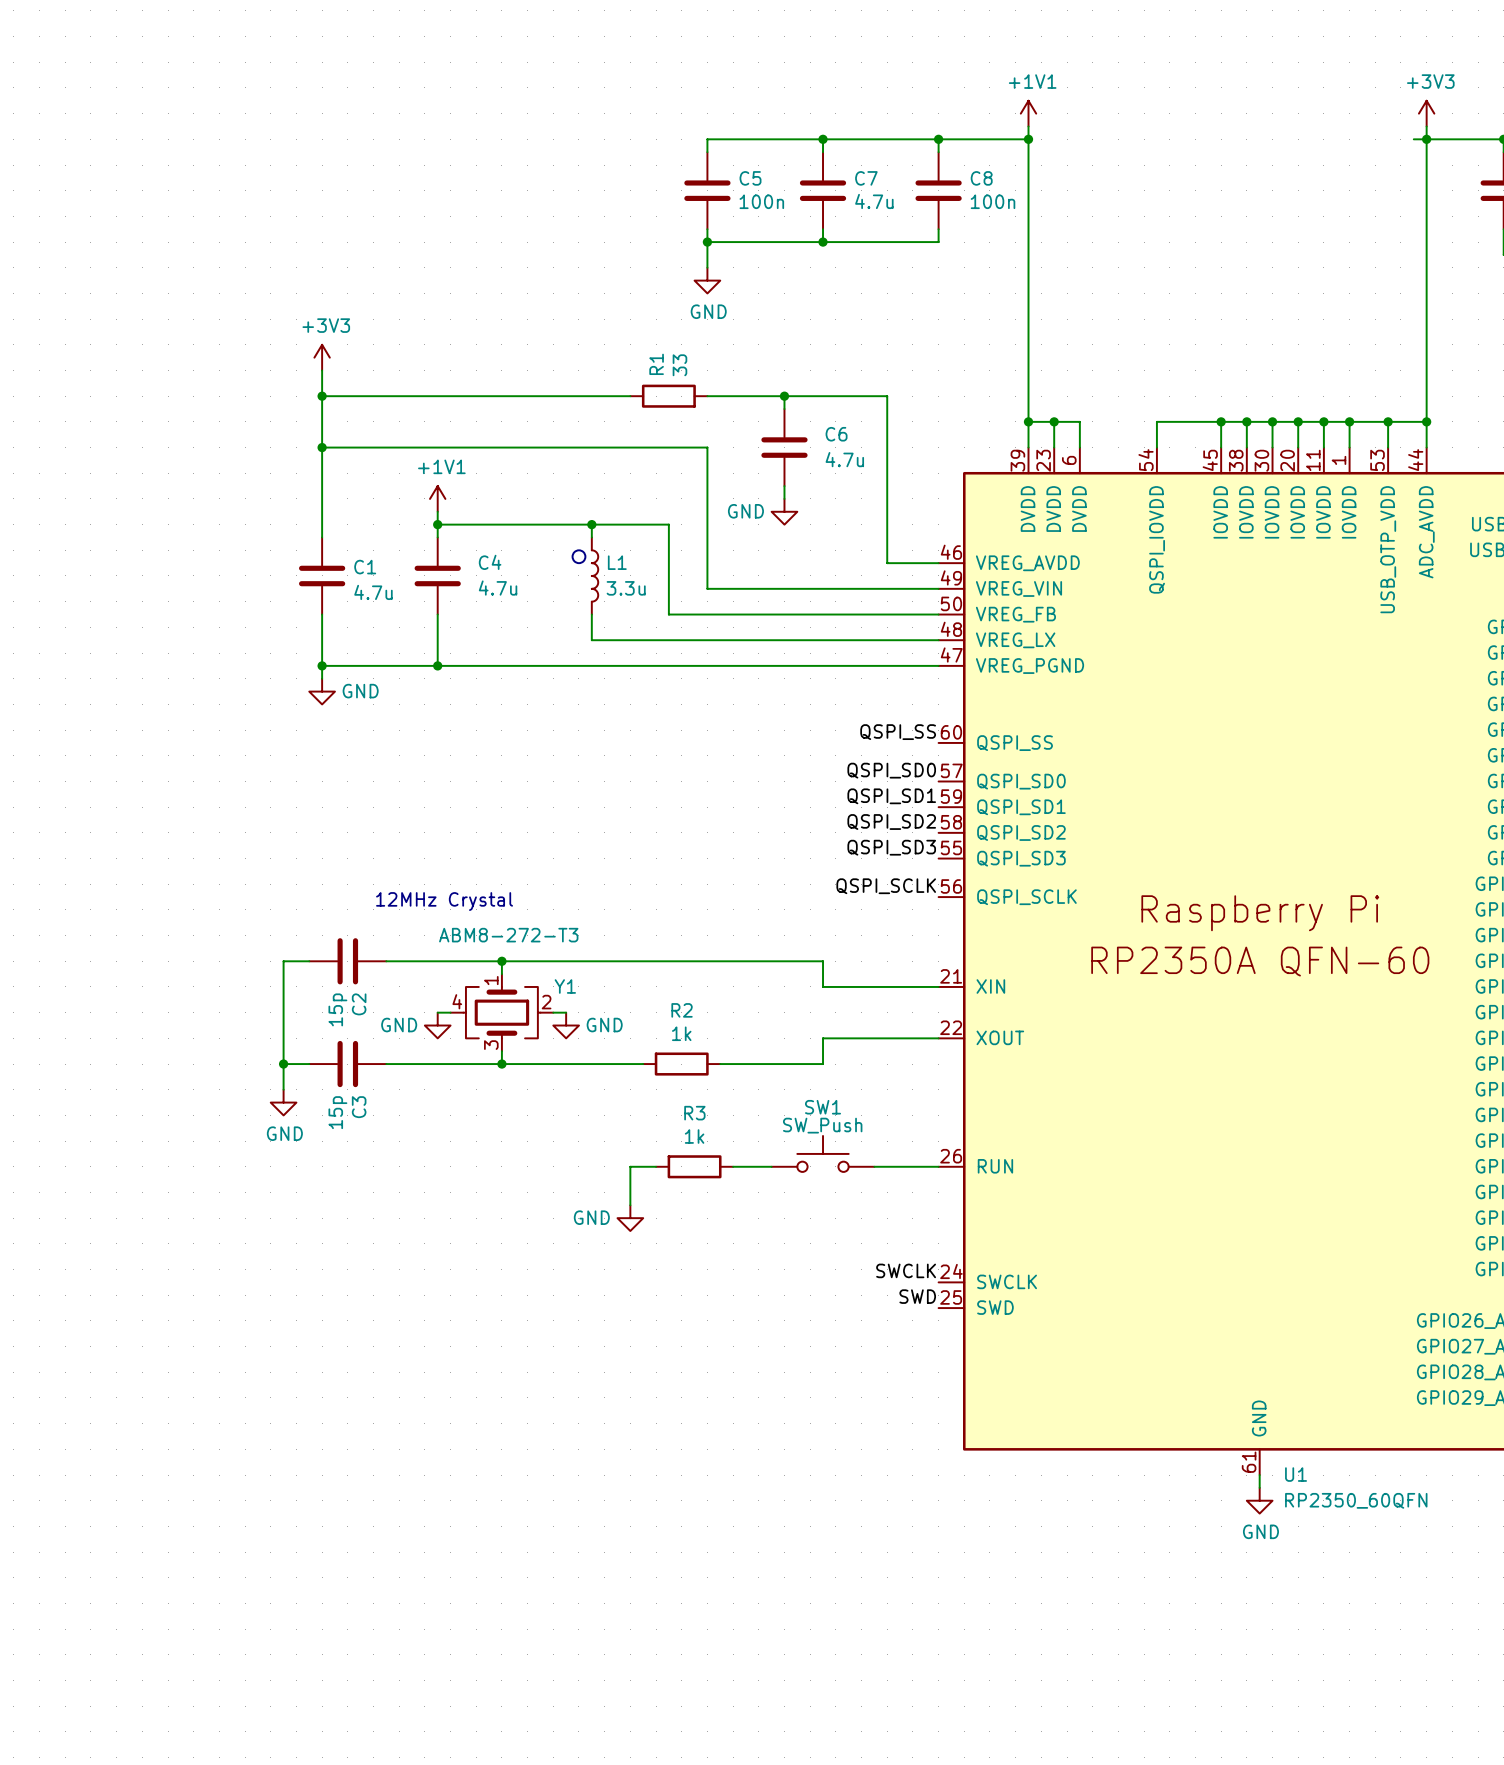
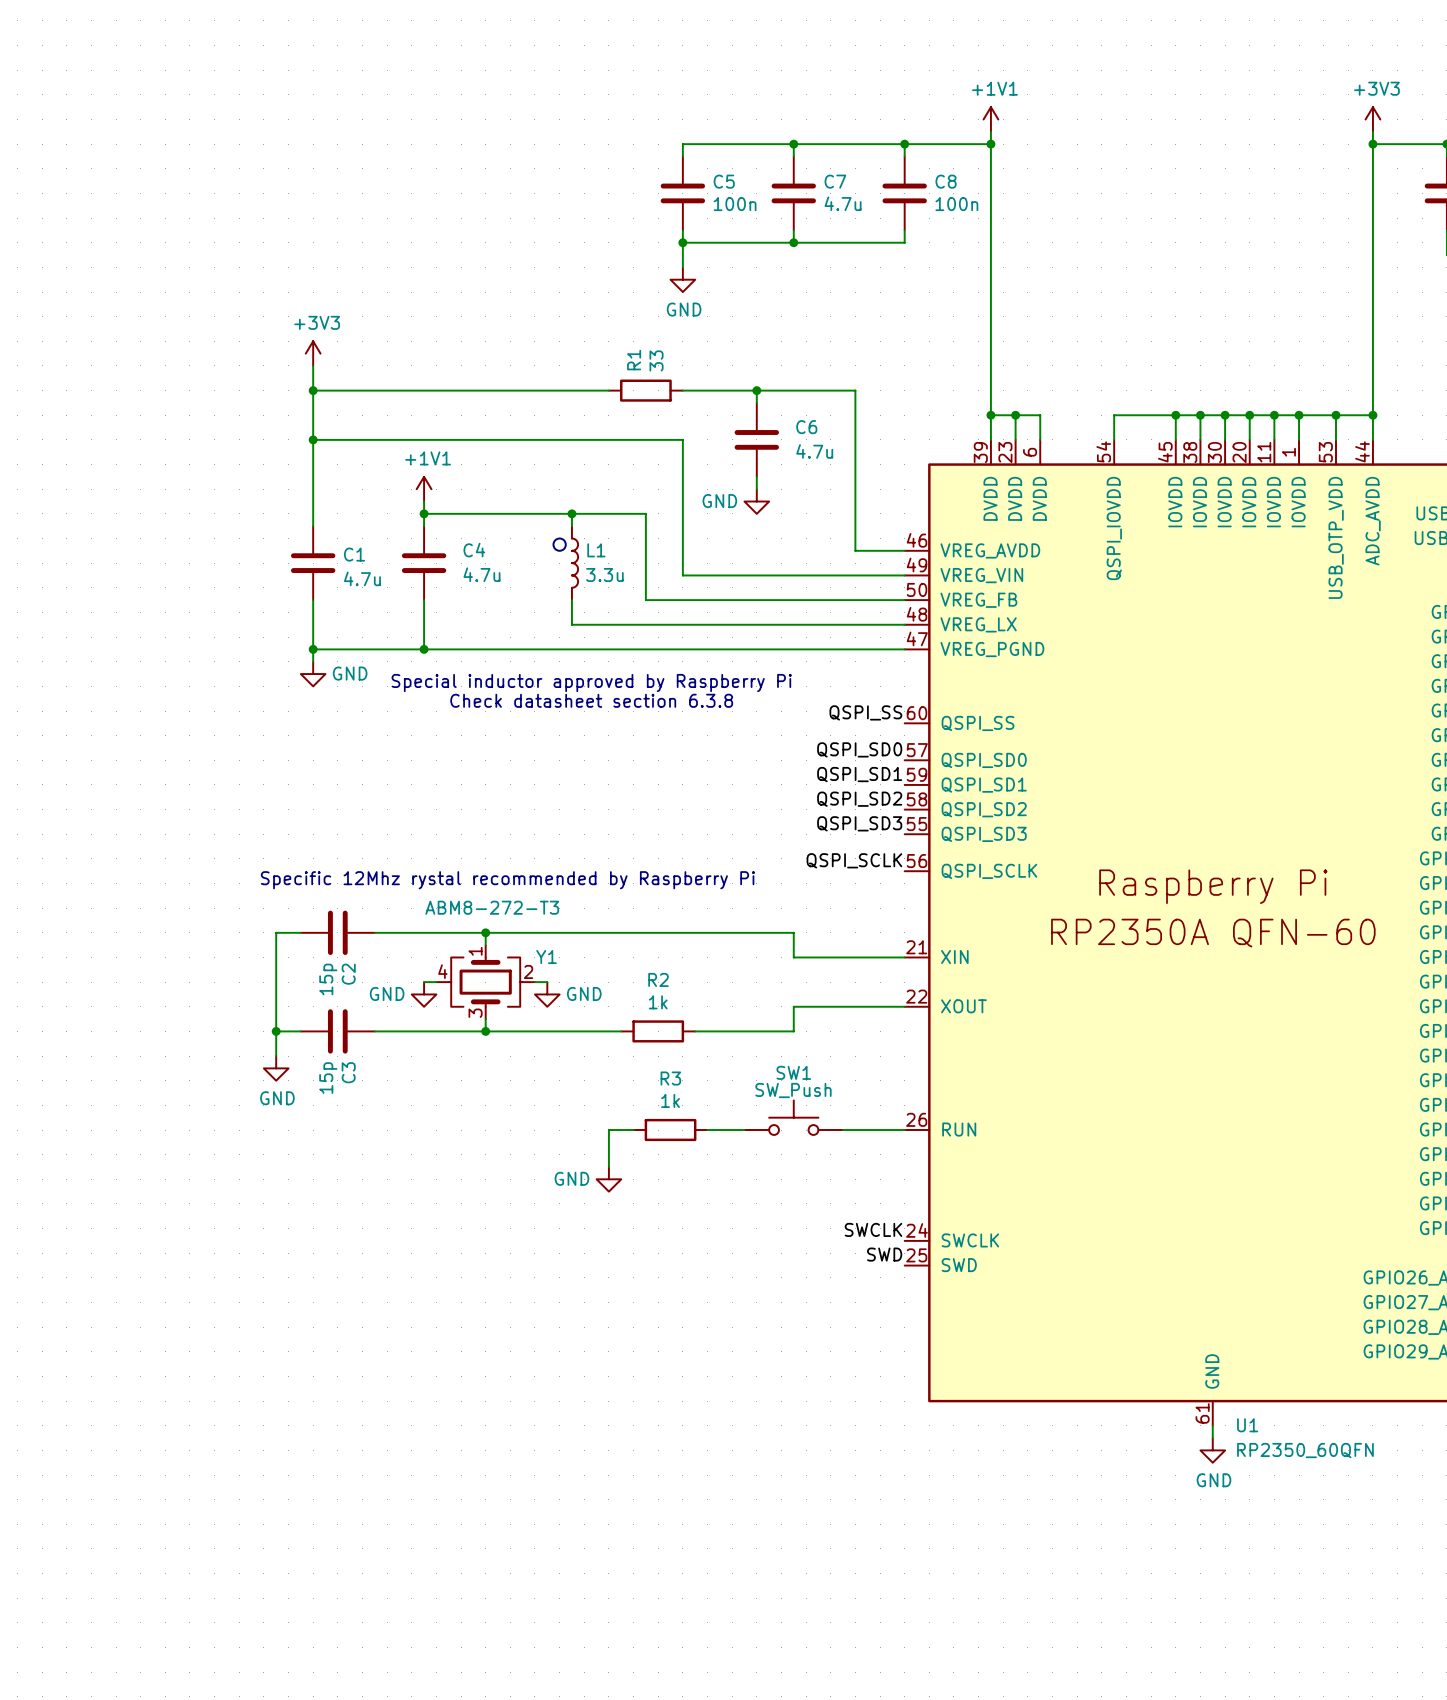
wire: (1413, 139) (1426, 139) -> none
text: none -> Special inductor approved by Raspberry Pi (591, 683)
text: none -> Check datasheet section 6.3.8 (591, 700)
text: 12MHz Crystal (444, 901) -> none
text: none -> Specific 12Mhz rystal recommended by Raspberry Pi (507, 880)

